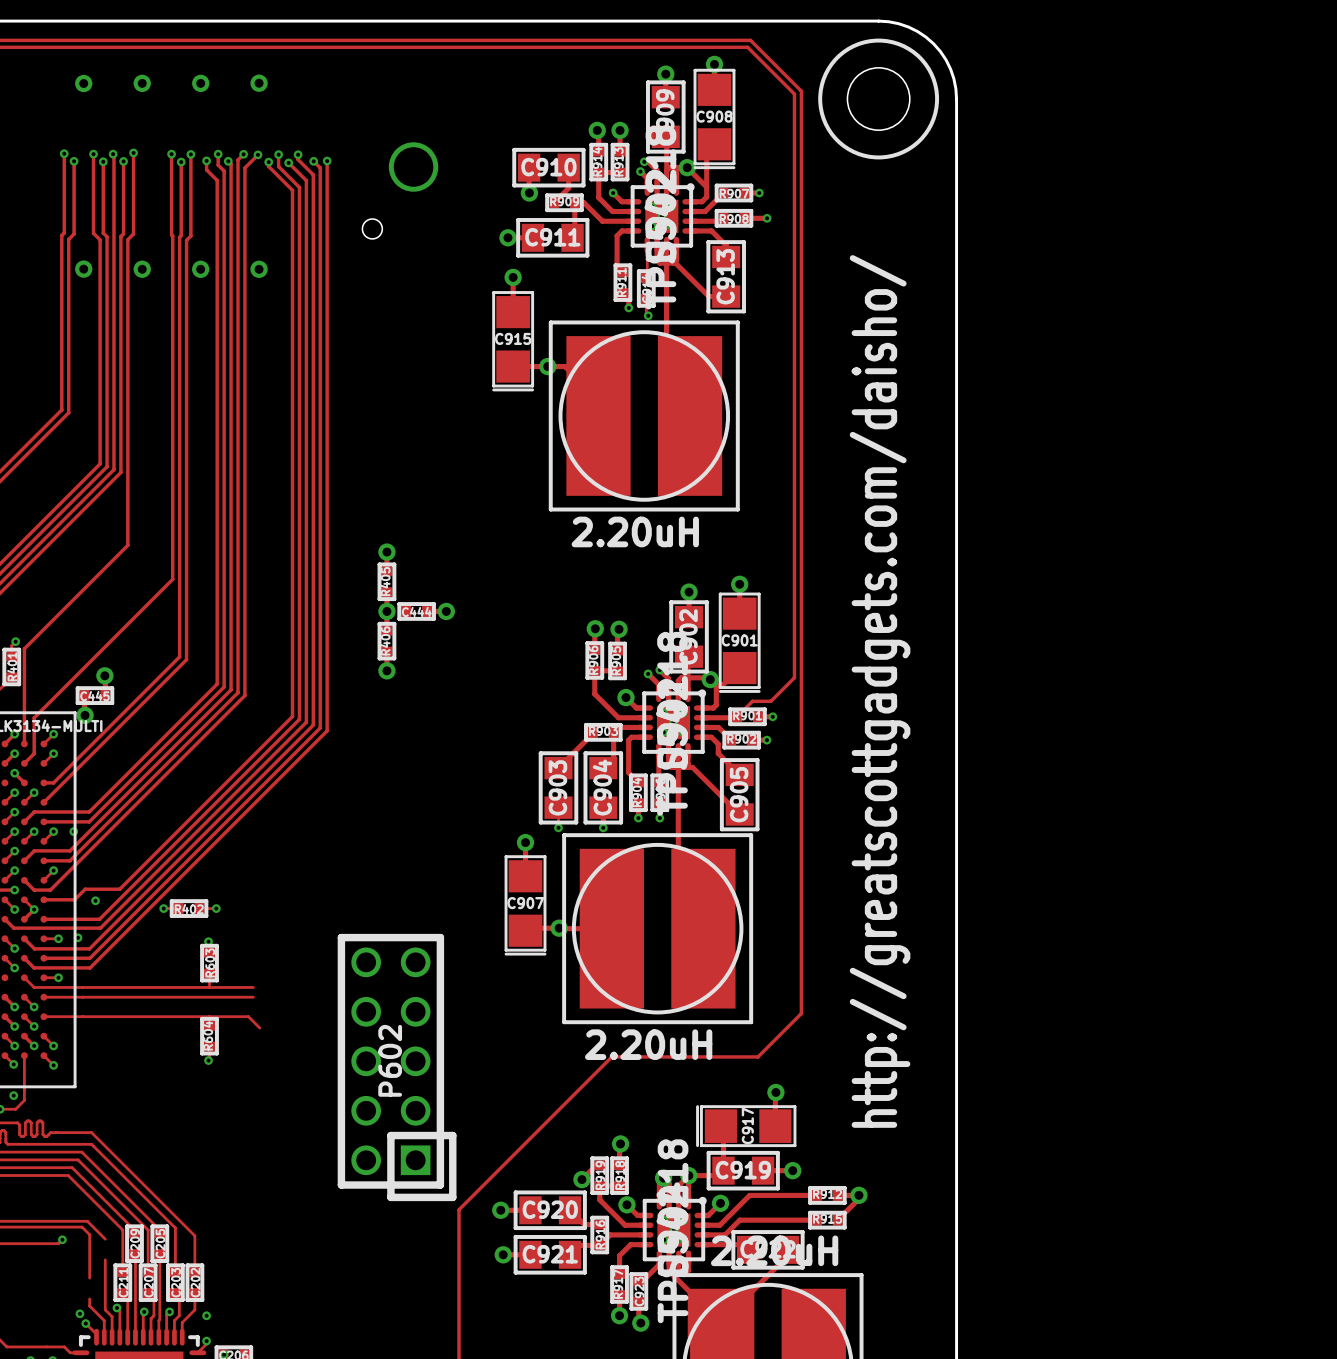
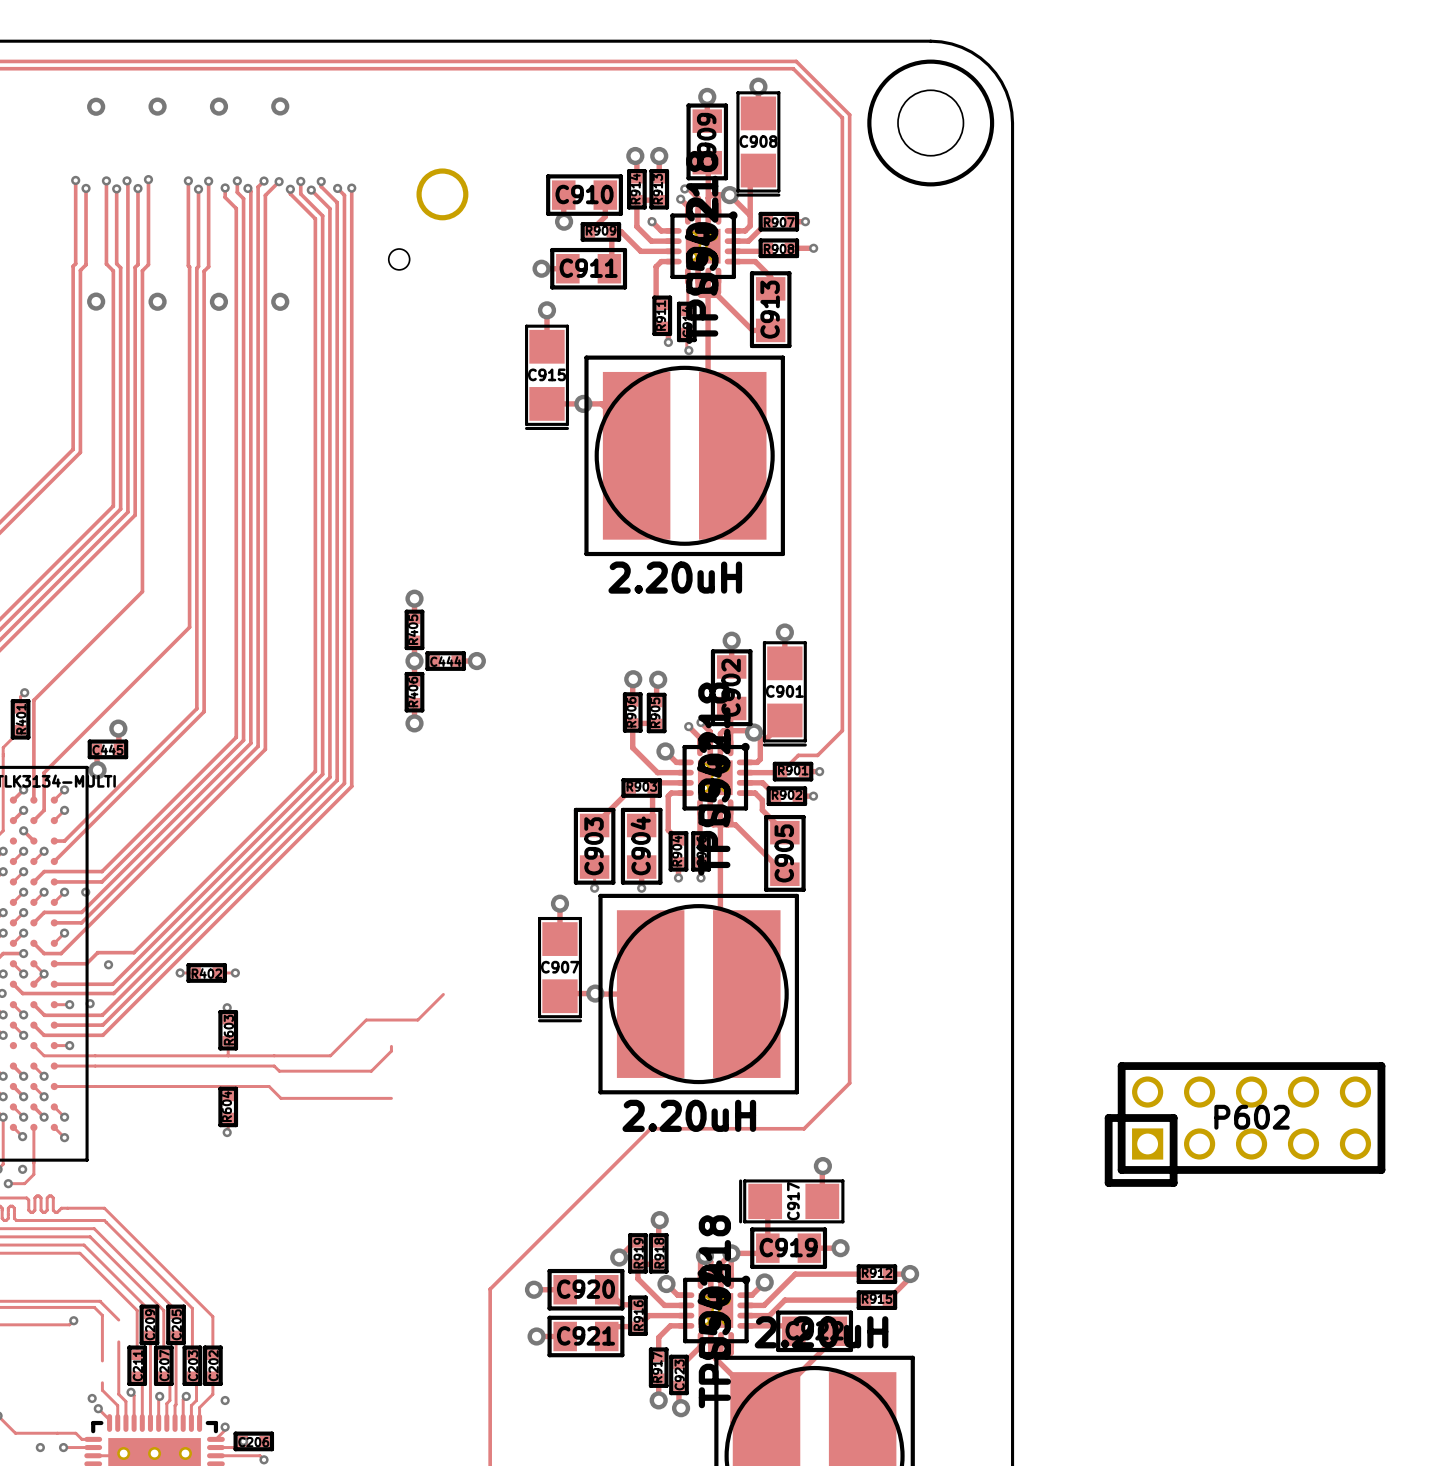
text: http://greatscottgadgets.com/daisho/ (880, 691) -> none
track: none -> (443, 994) (417, 1020) (366, 1020) (330, 1055) (274, 1055)
track: none -> (391, 1046) (391, 1051) (371, 1071) (279, 1071) (274, 1066)
track: none -> (280, 1098) (391, 1098)
P602 rotation: 0° (397, 1067) -> 90° clockwise (1245, 1124)
P602 position: (397, 1067) -> (1245, 1124)

